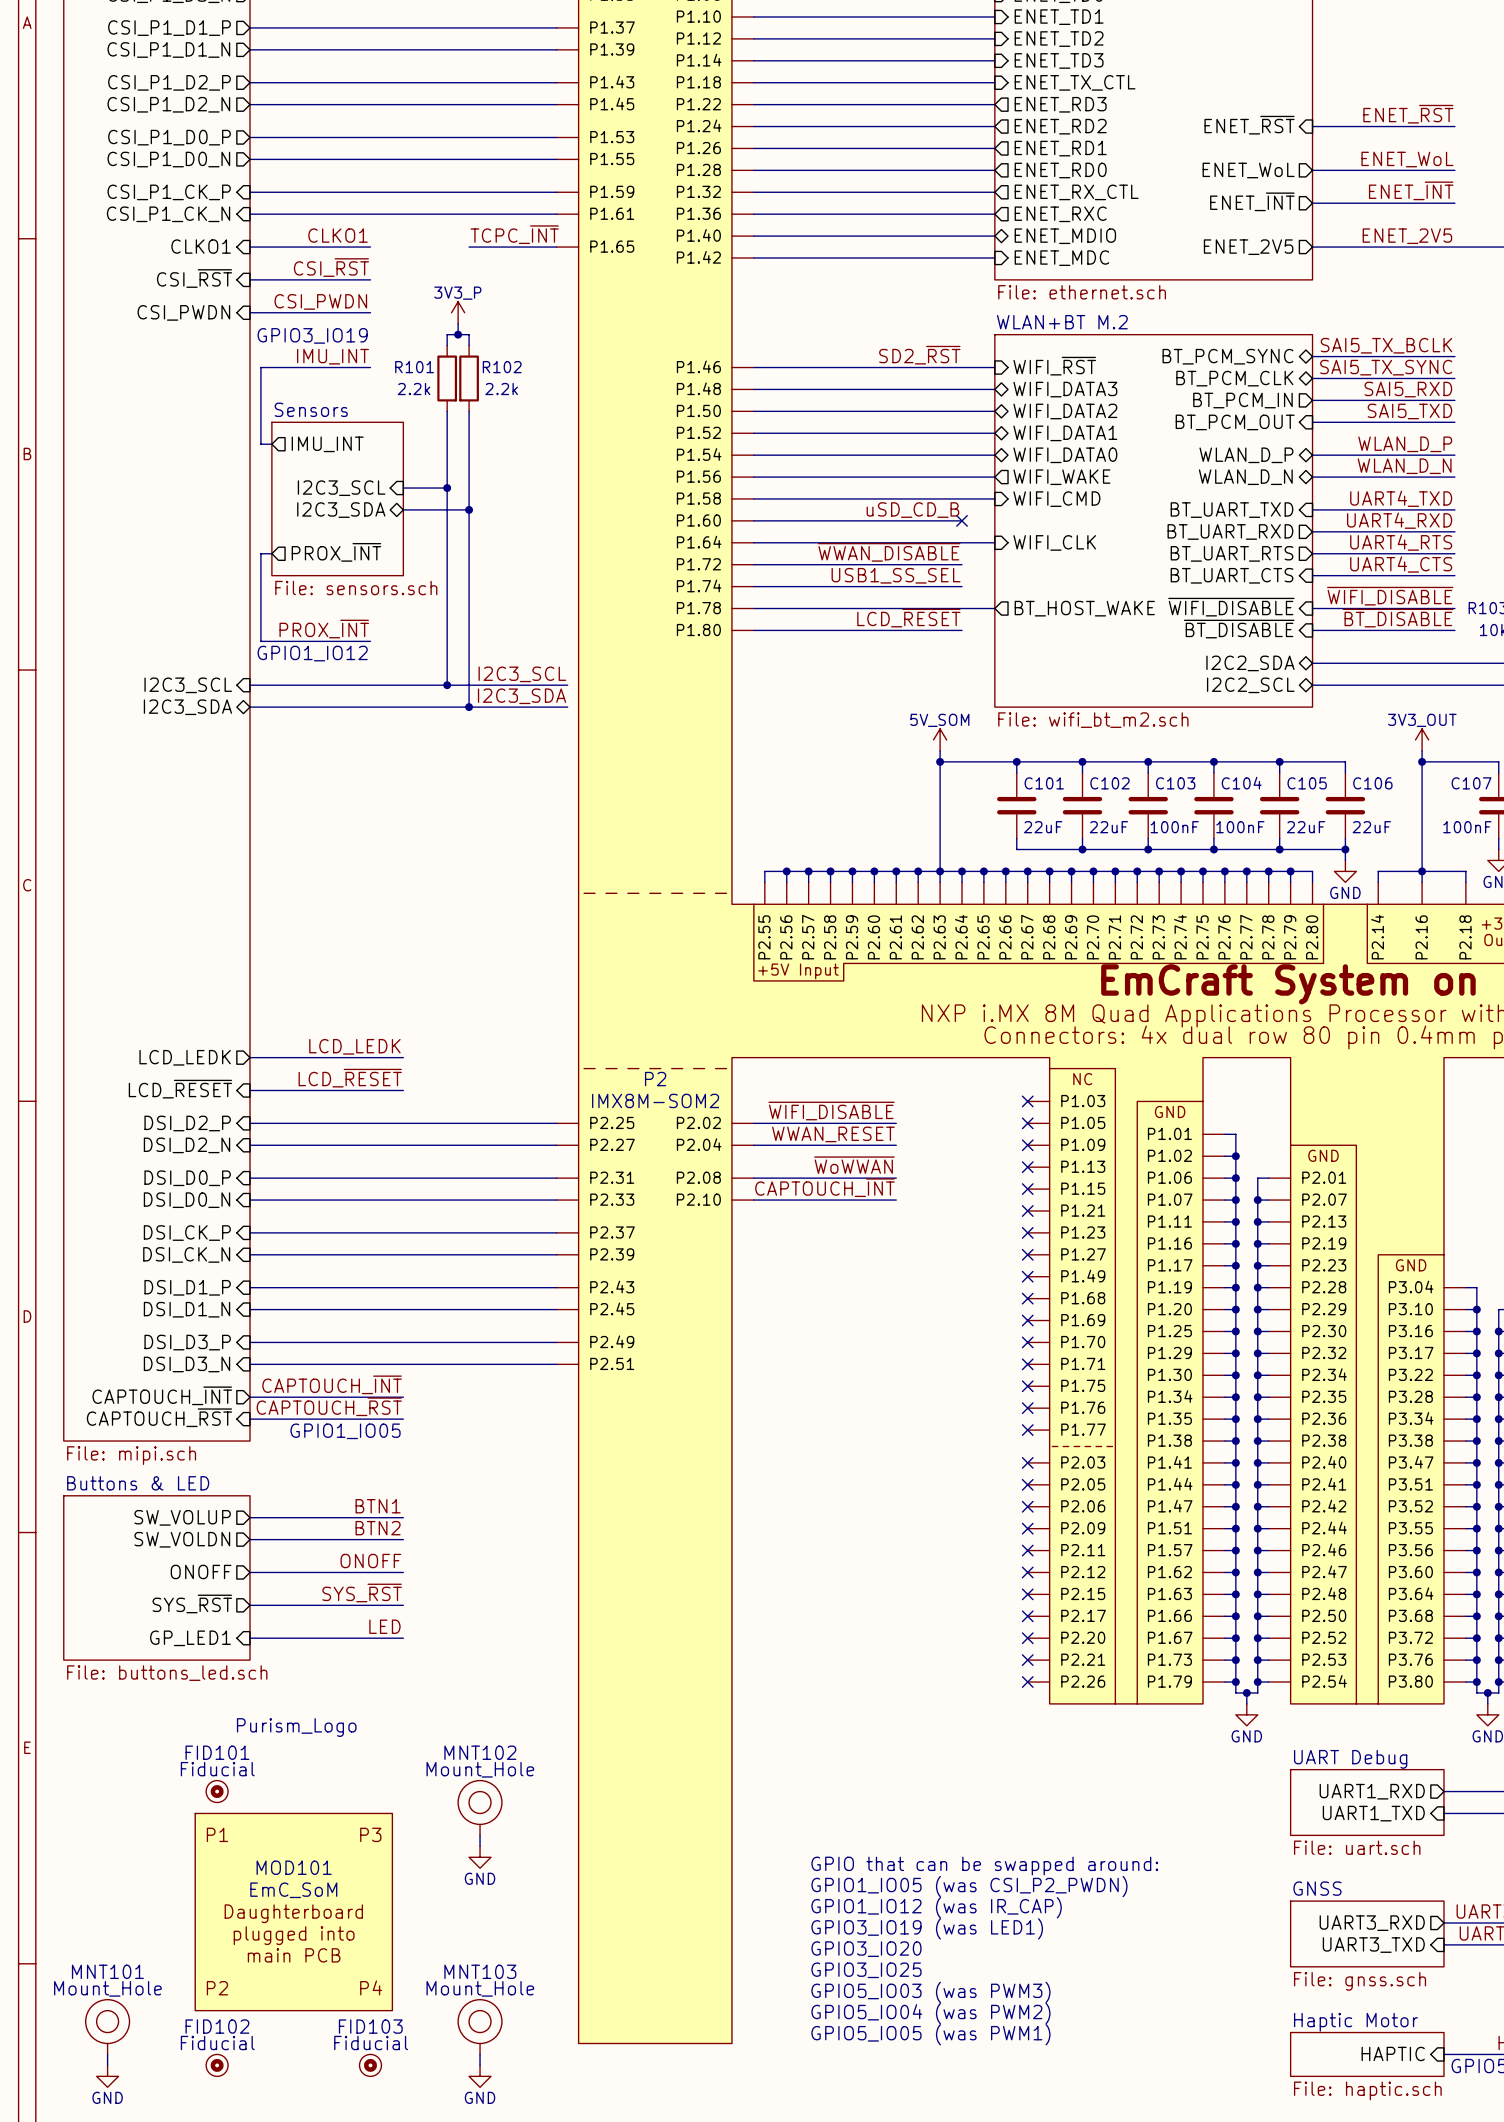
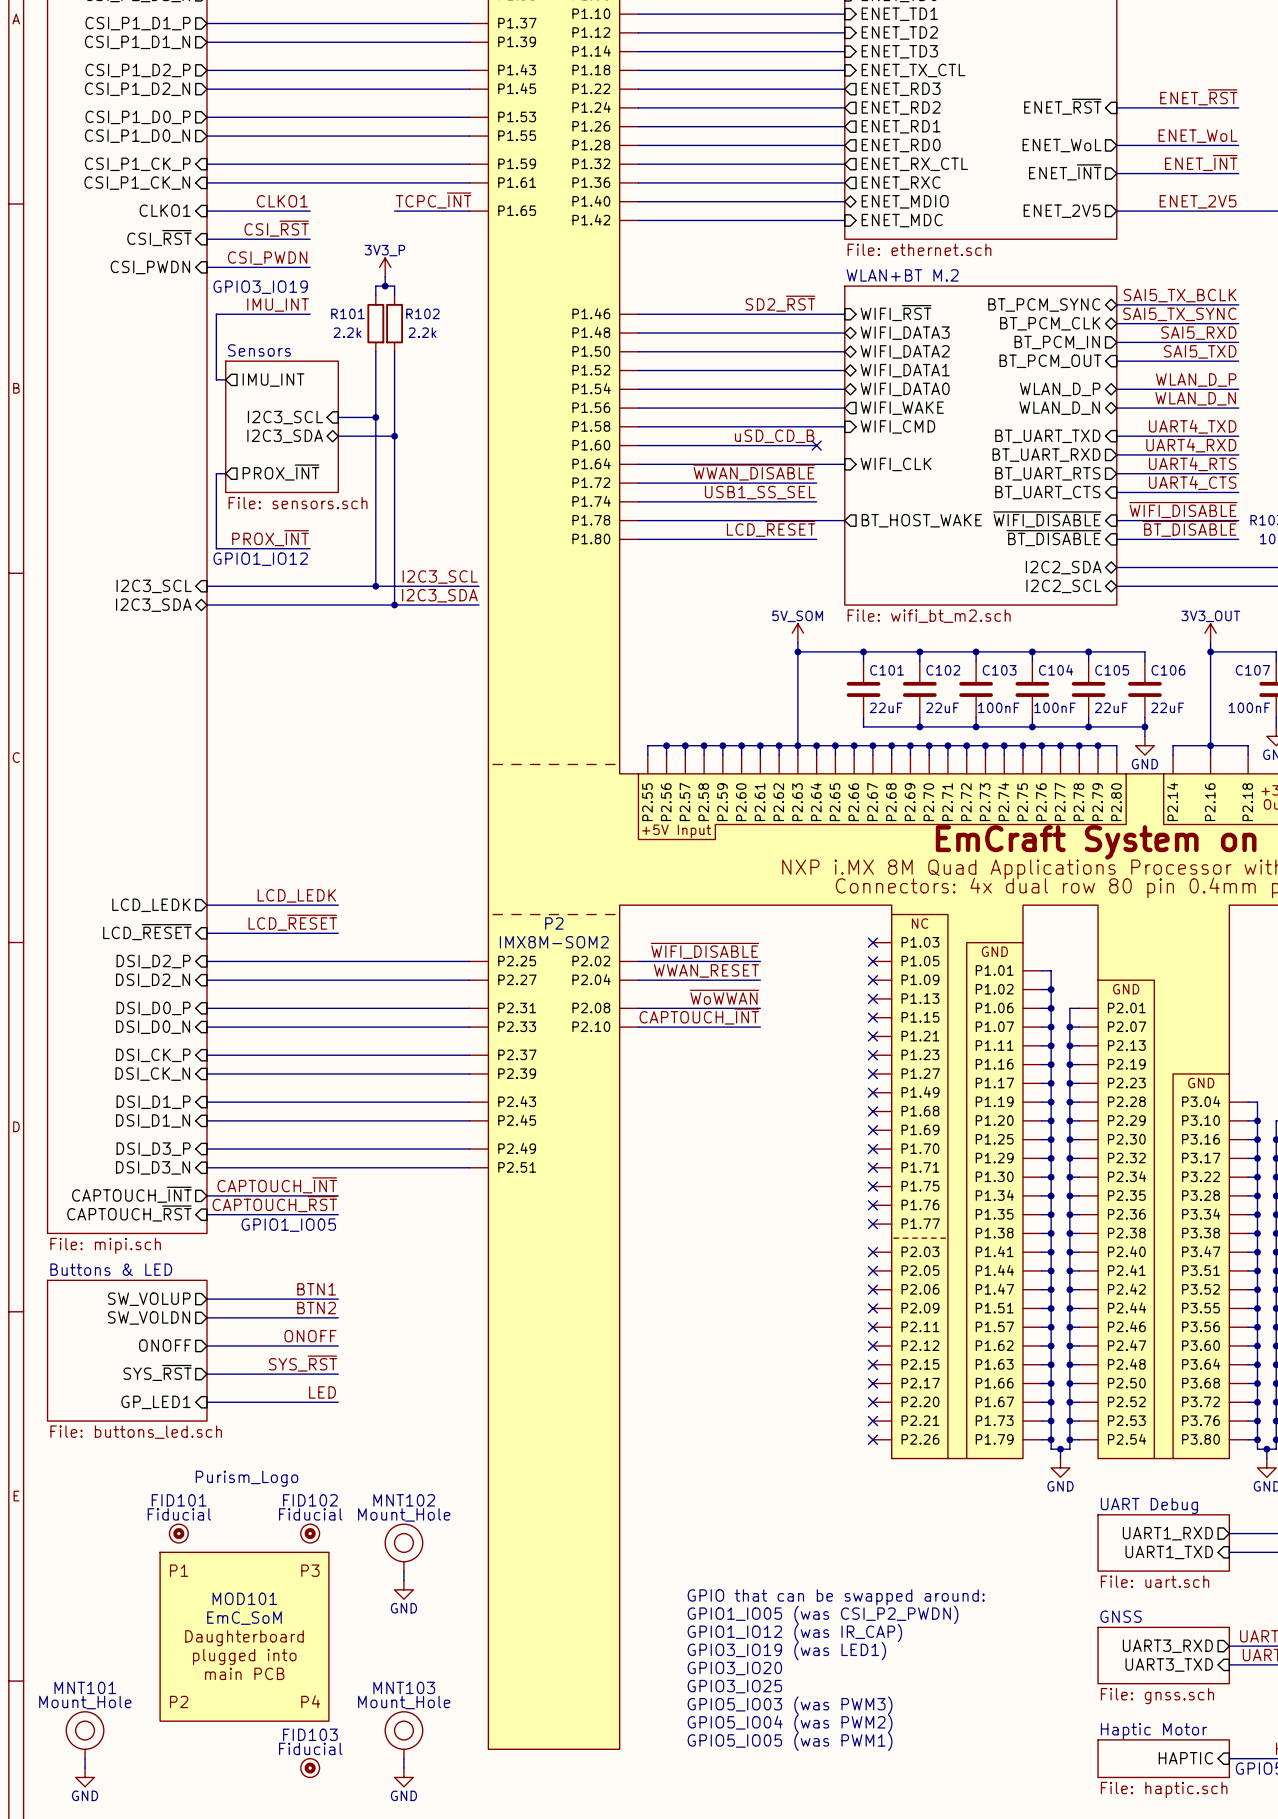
FID102 position: (217, 2065) -> (310, 1533)

